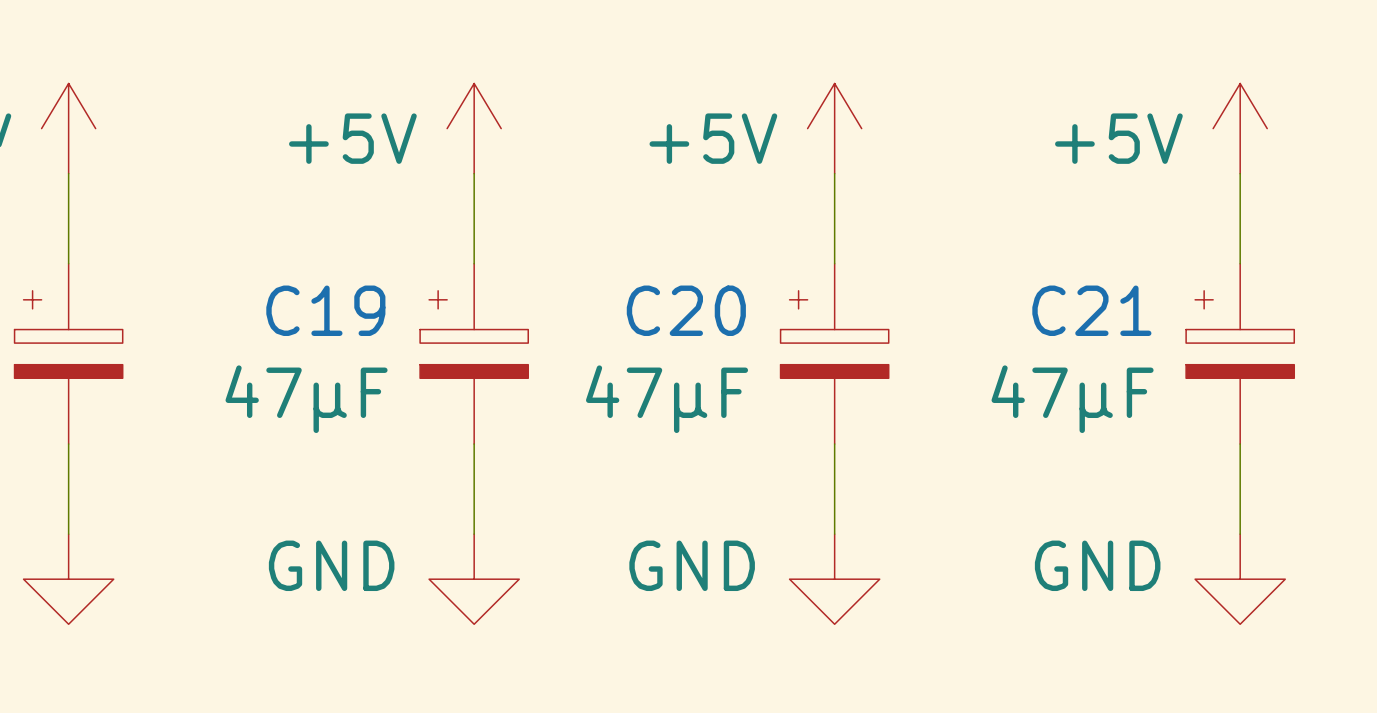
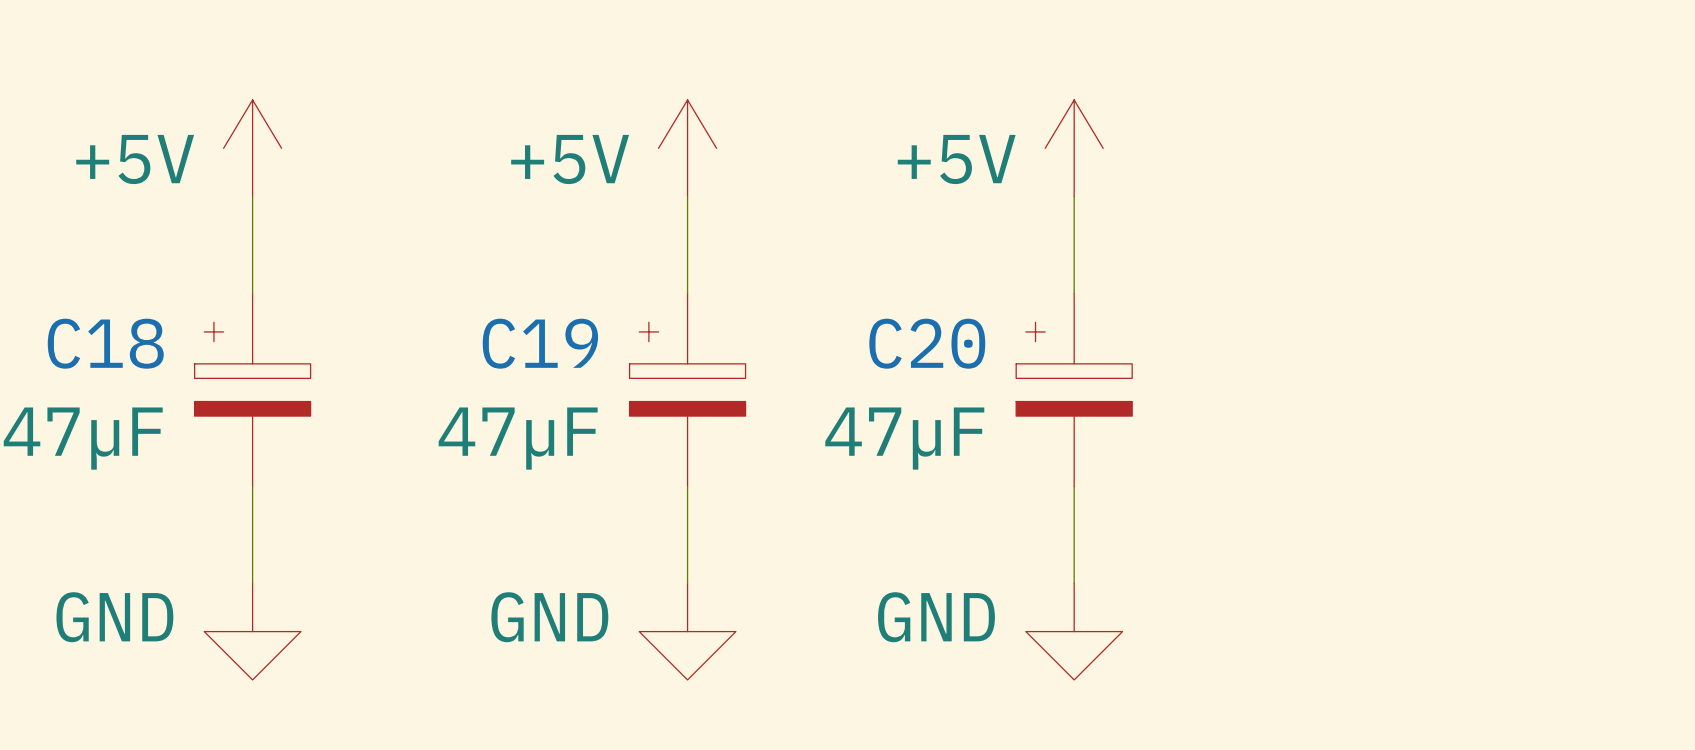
power symbol: +5V (1240, 128) -> none
wire: (1240, 173) (1240, 263) -> none
C21: 47µF (1240, 353) -> none
wire: (1240, 444) (1240, 534) -> none
power symbol: GND (1240, 579) -> none

